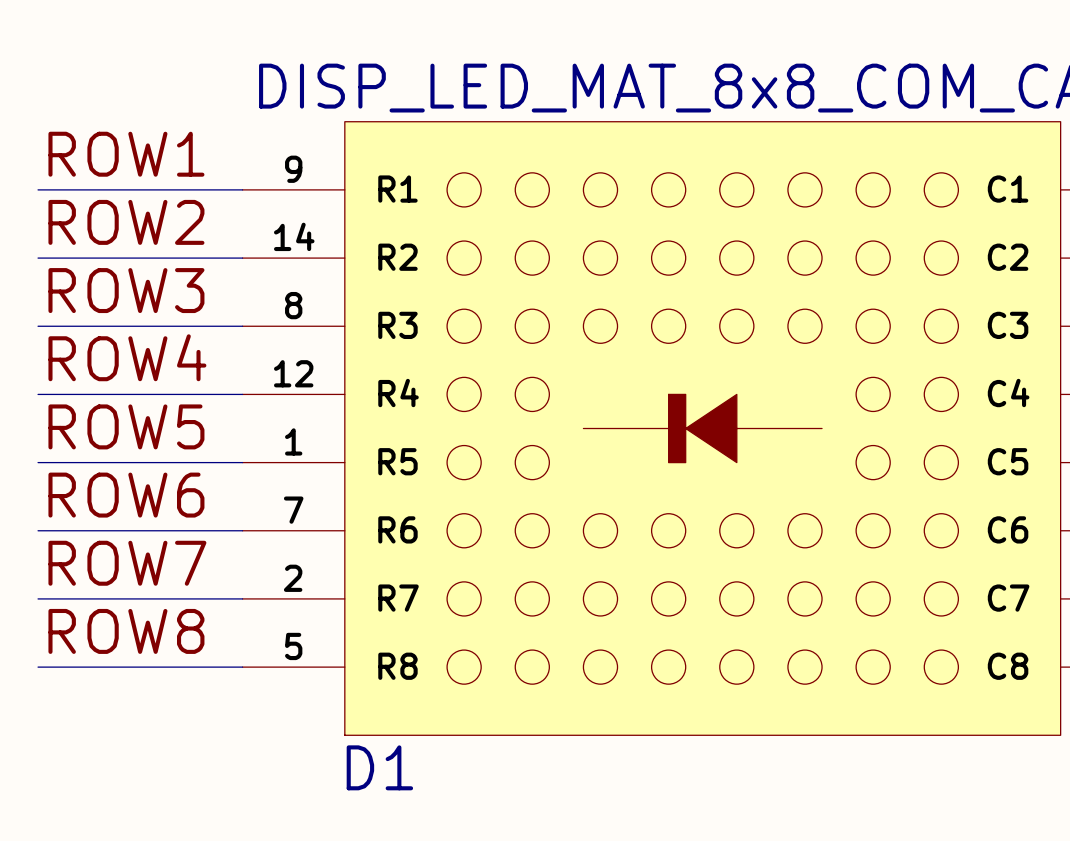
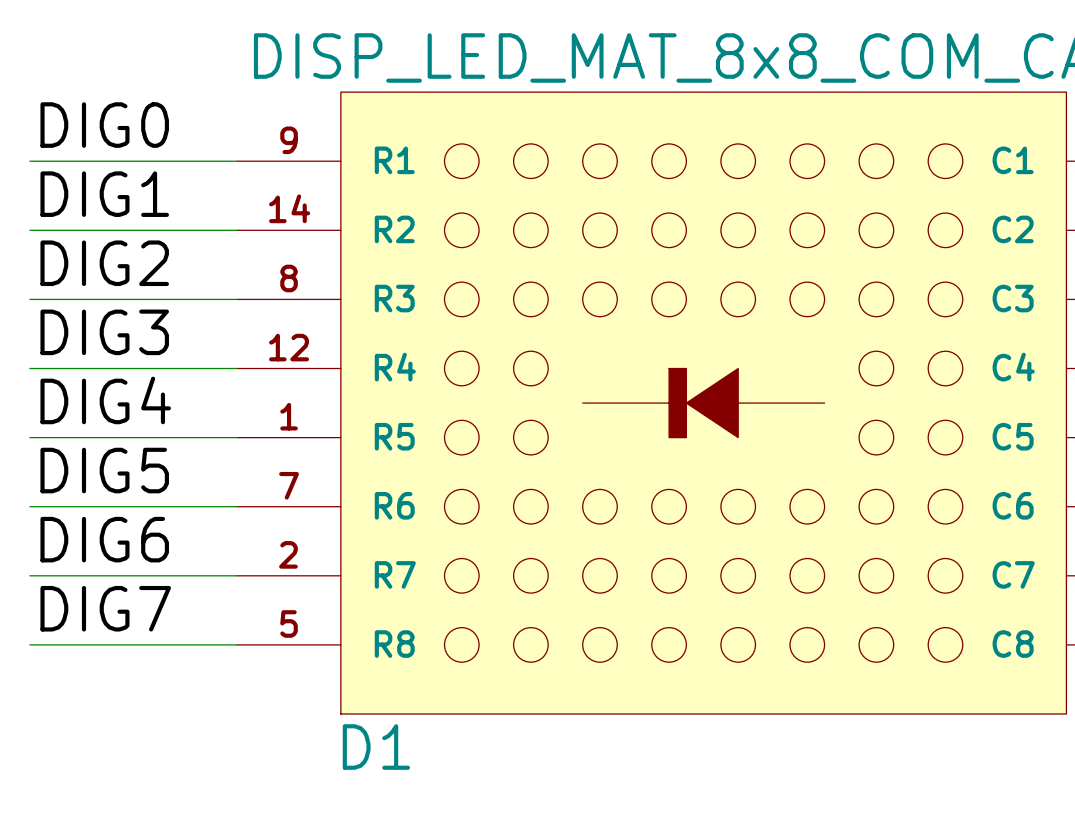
label: ROW1 (126, 154) -> DIG0 (104, 125)
label: ROW2 (126, 222) -> DIG1 (104, 194)
label: ROW3 (126, 290) -> DIG2 (104, 263)
label: ROW4 (127, 357) -> DIG3 (104, 332)
label: ROW5 (126, 426) -> DIG4 (105, 400)
label: ROW6 (126, 495) -> DIG5 (104, 470)
label: ROW7 (127, 563) -> DIG6 (104, 539)
label: ROW8 (126, 631) -> DIG7 (105, 608)

